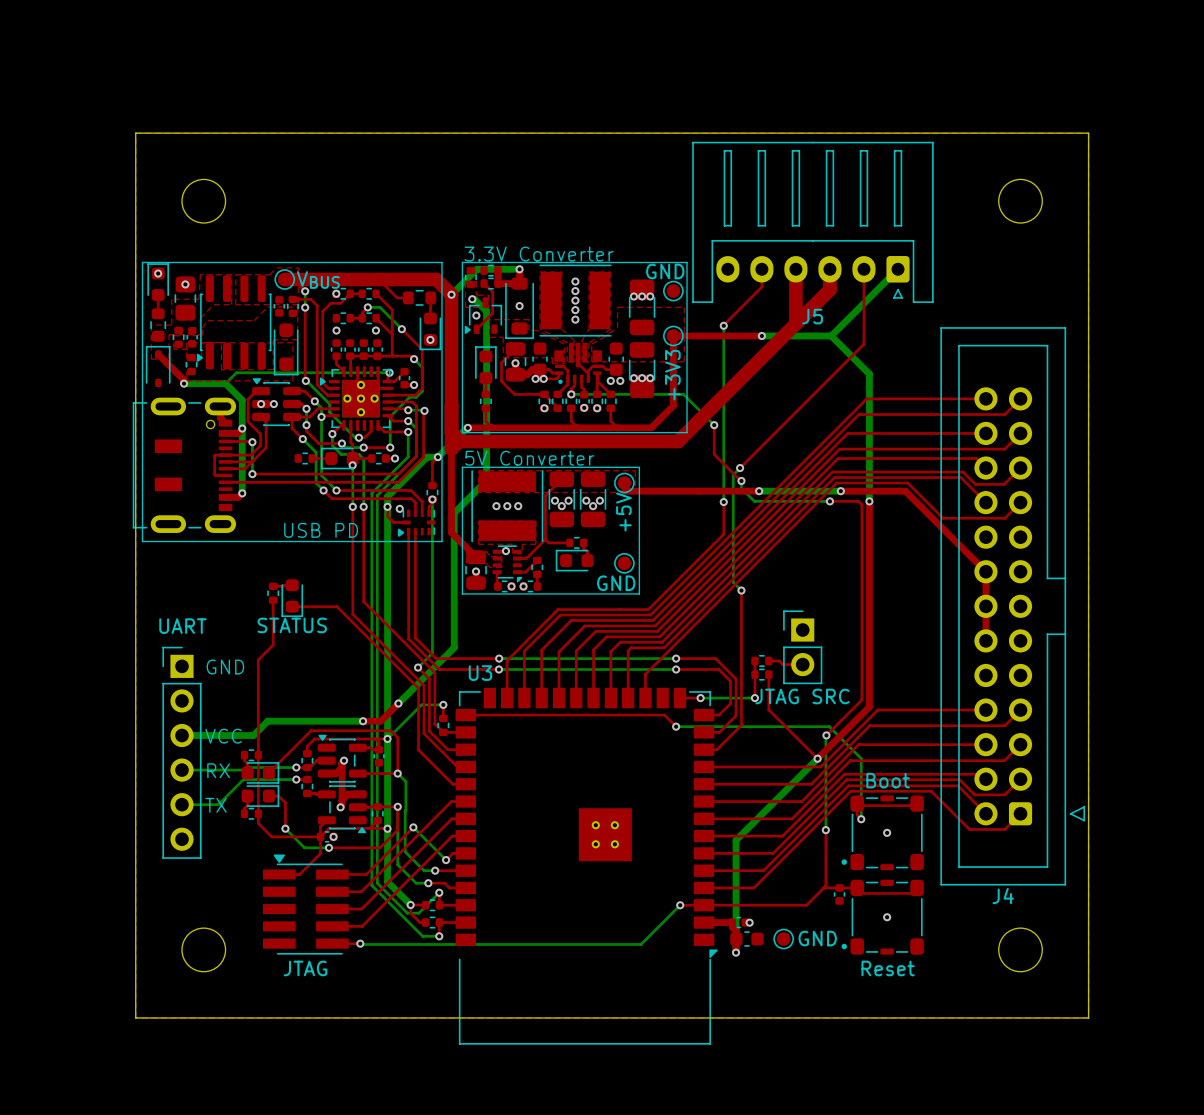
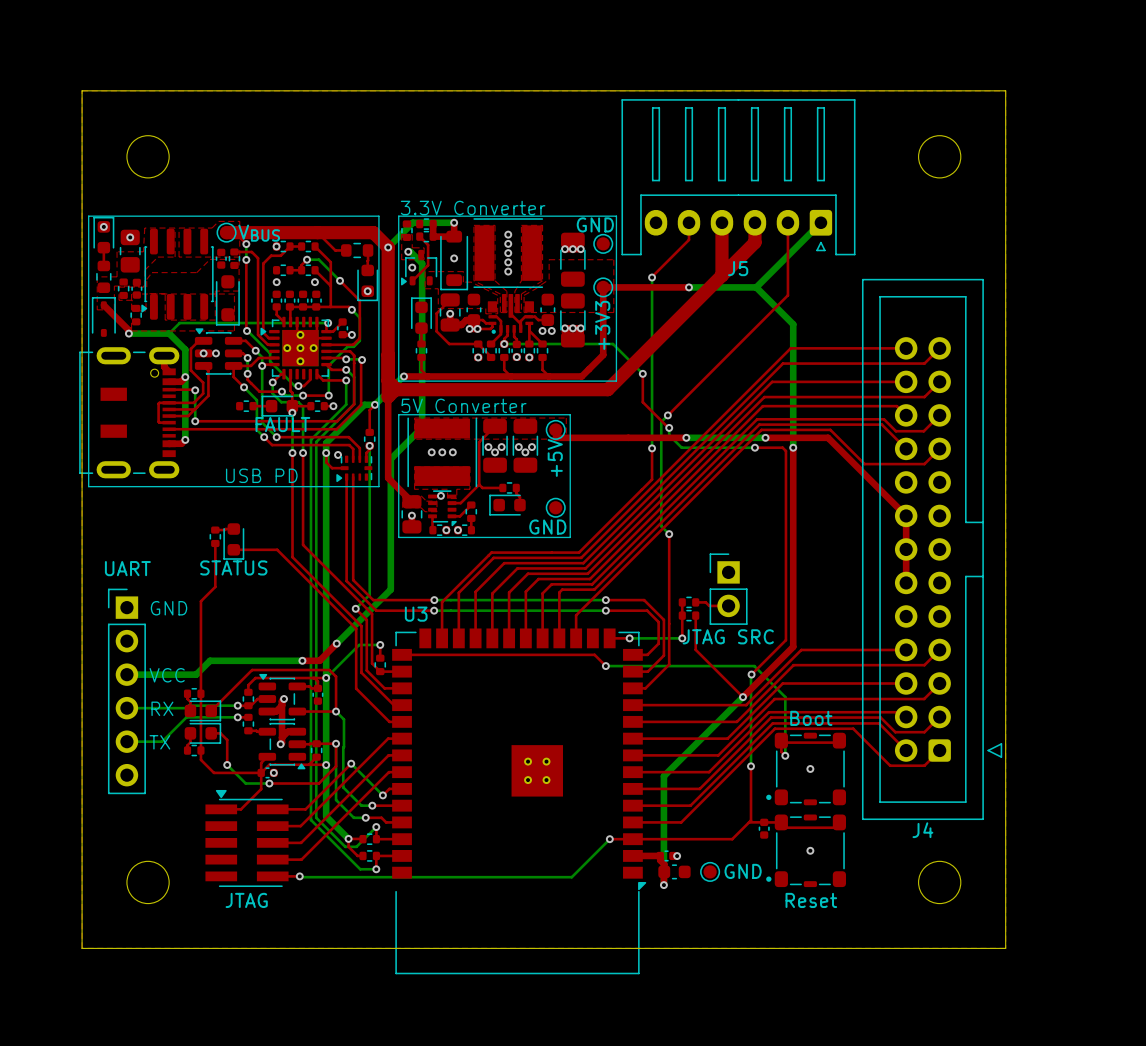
part value: none -> FAULT (282, 424)

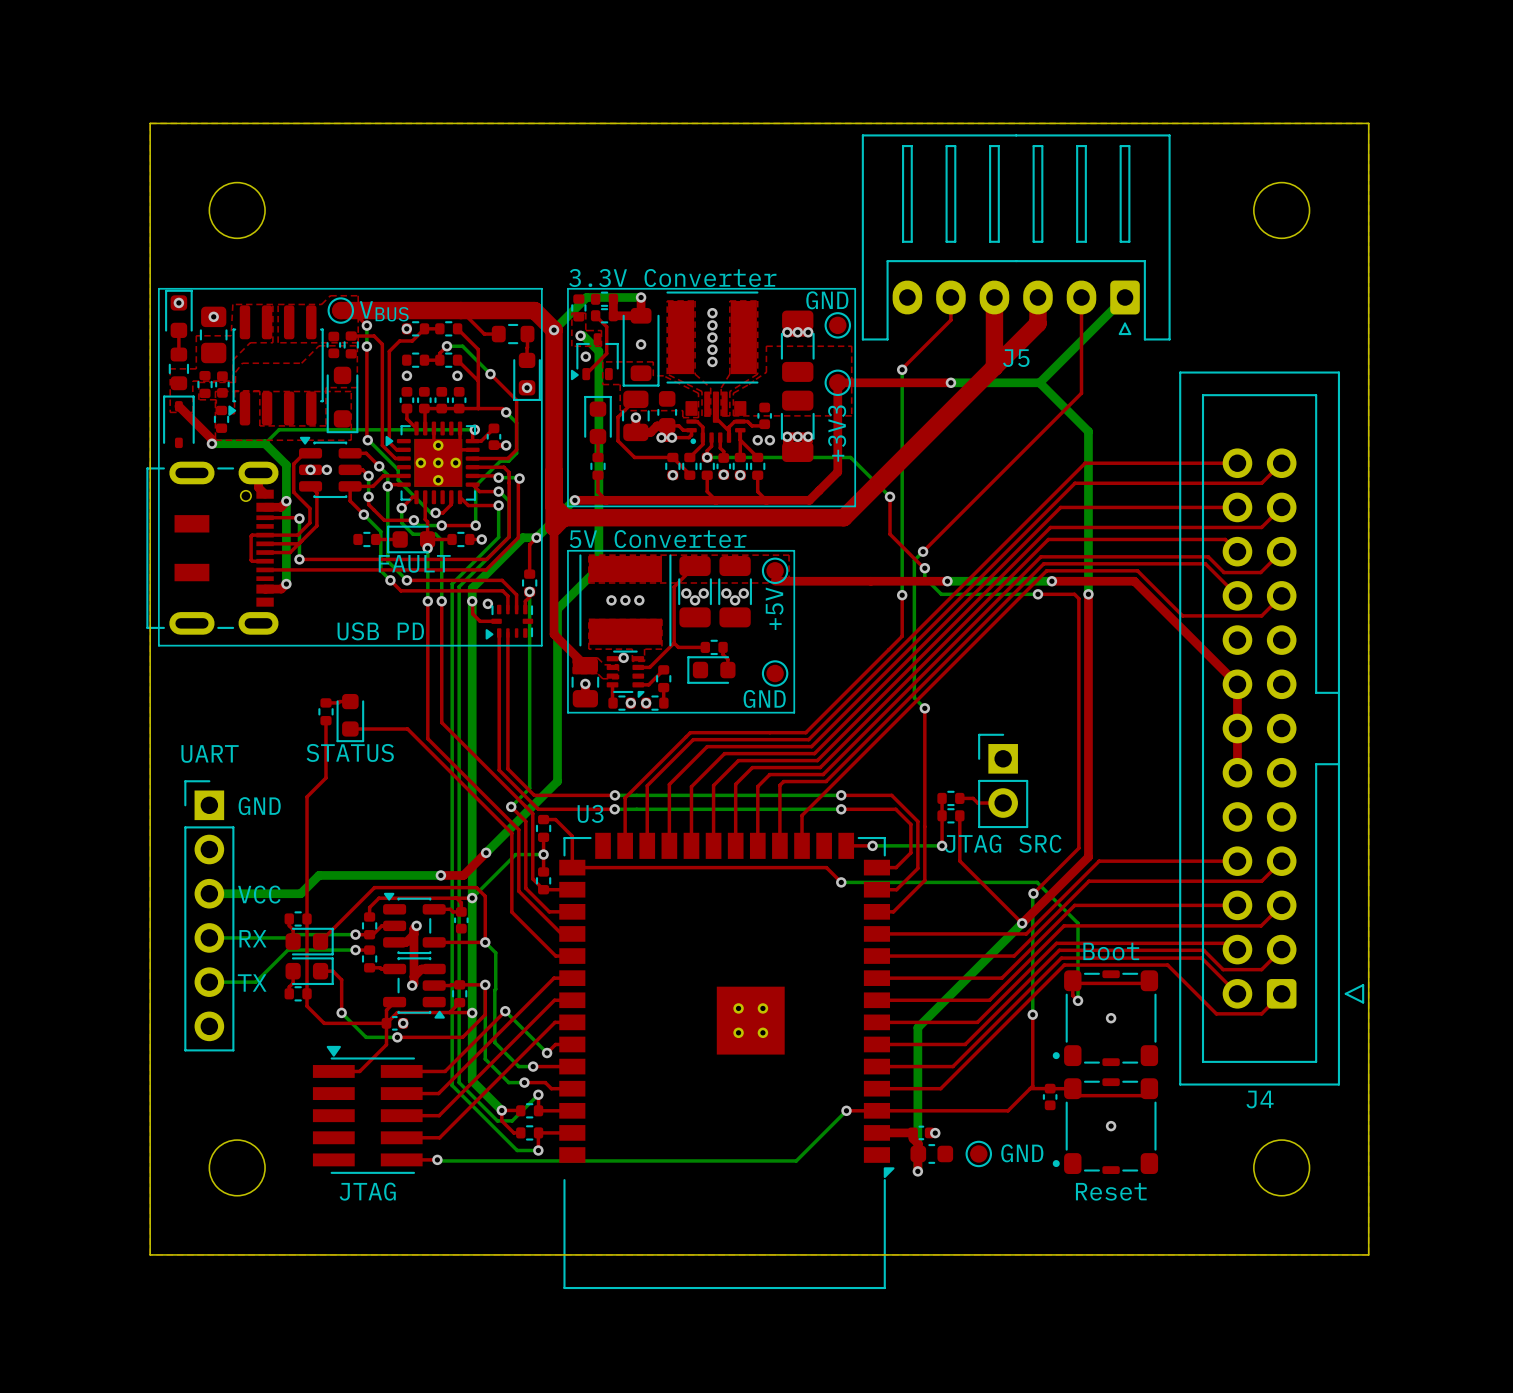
part footprint: [540, 293, 556, 327] -> [757, 402, 772, 430]
top track: none -> (543, 819) (555, 819) (572, 836) (572, 867)
part: none -> (543, 828)
top track: none -> (543, 837) (543, 854)

